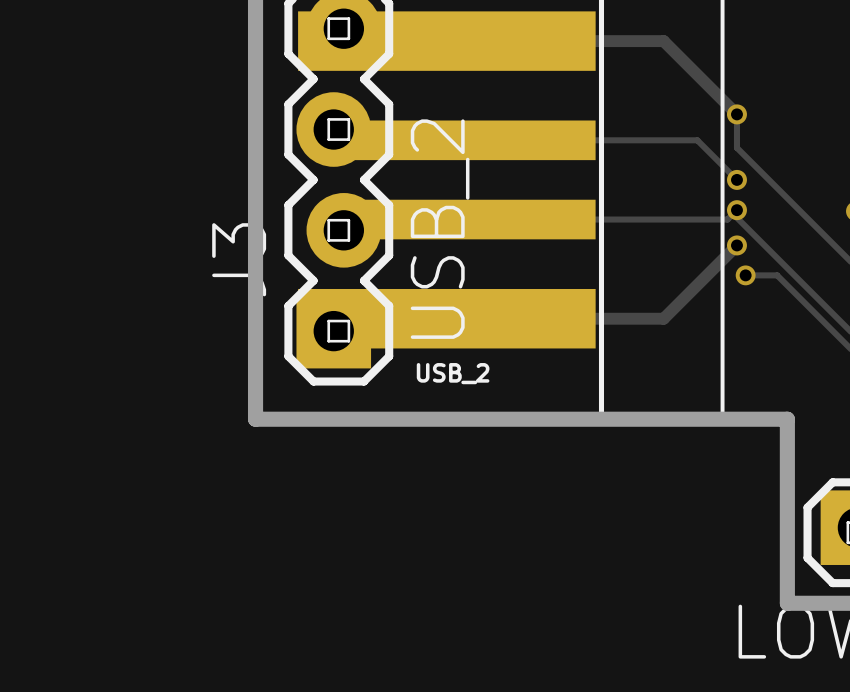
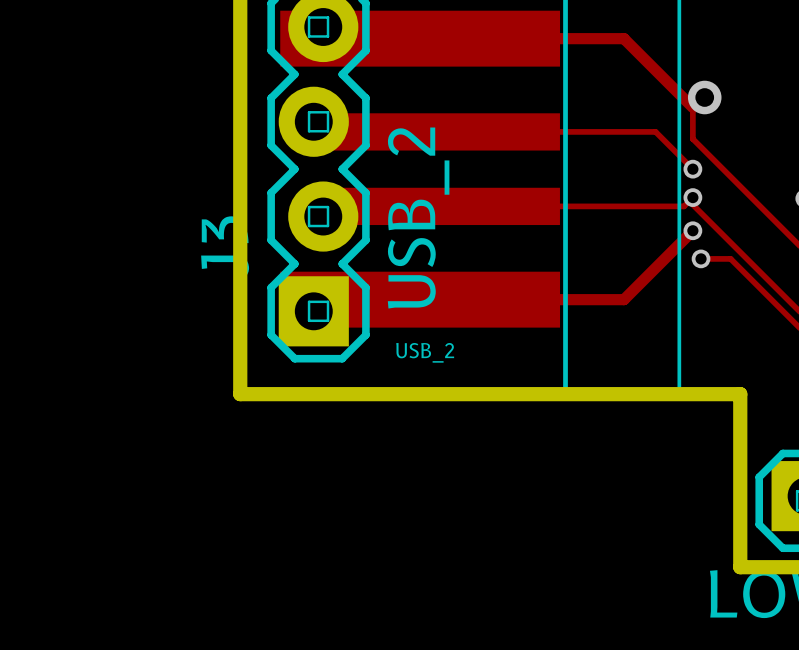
via size: [726, 104, 747, 125] -> [687, 80, 722, 115]

